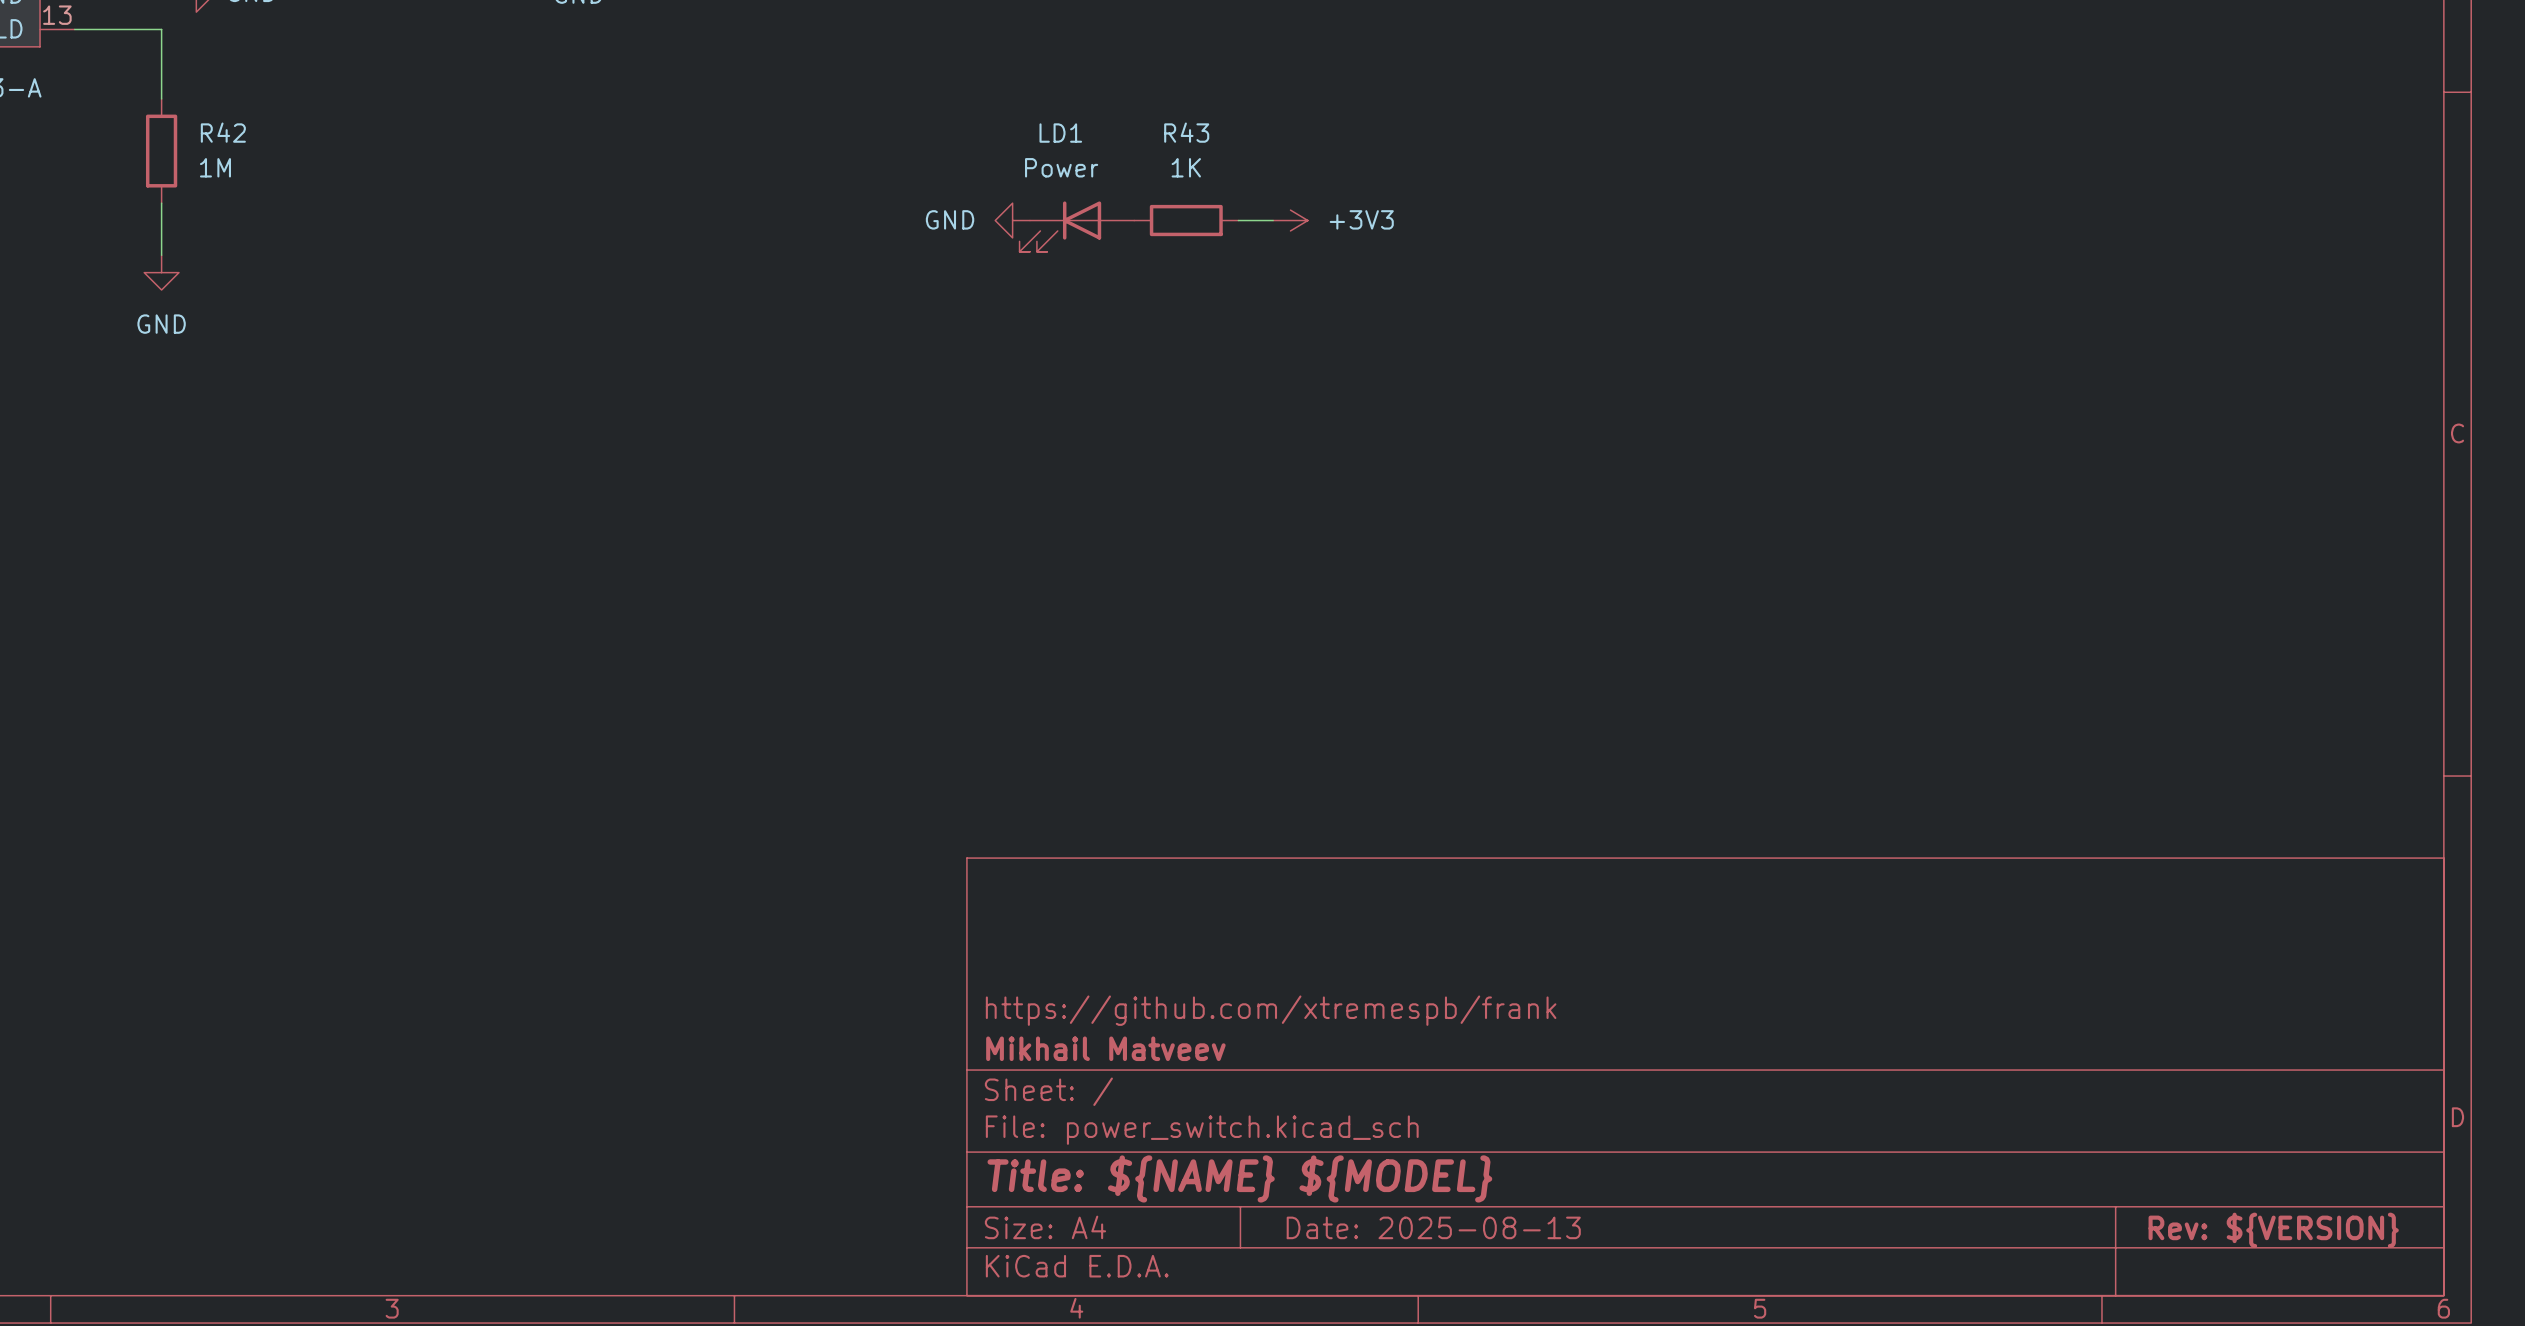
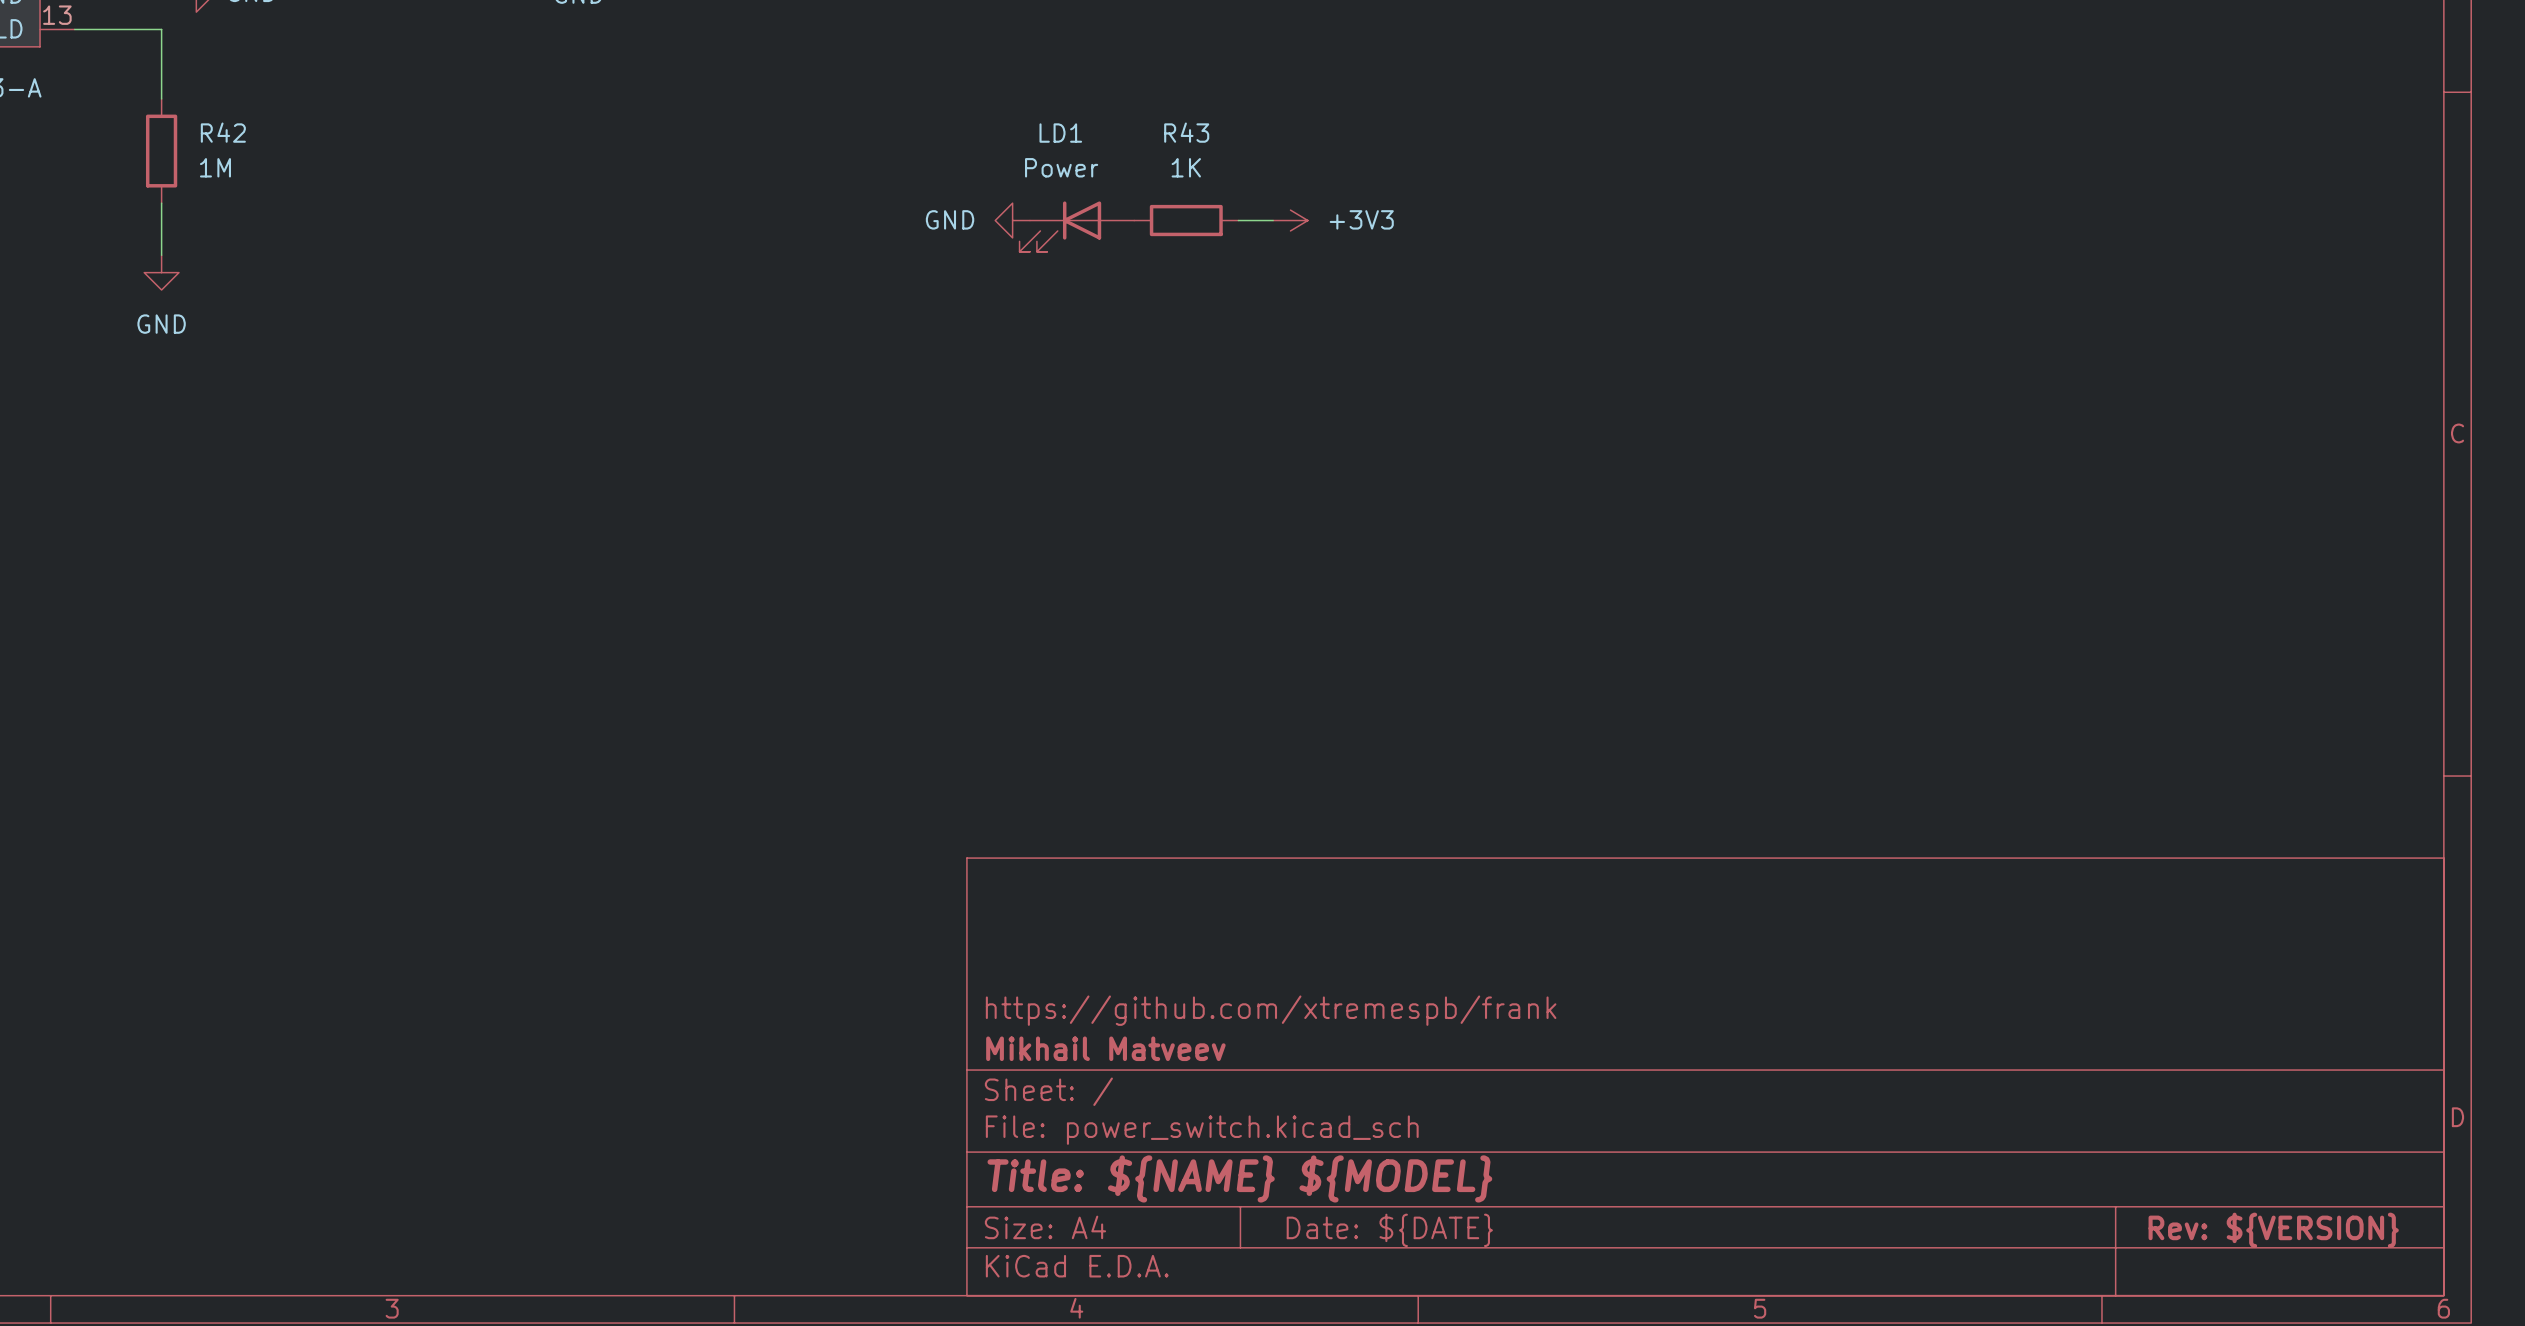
title block: Date: 2025-08-13 (1433, 1227) -> Date: ${DATE} (1389, 1230)

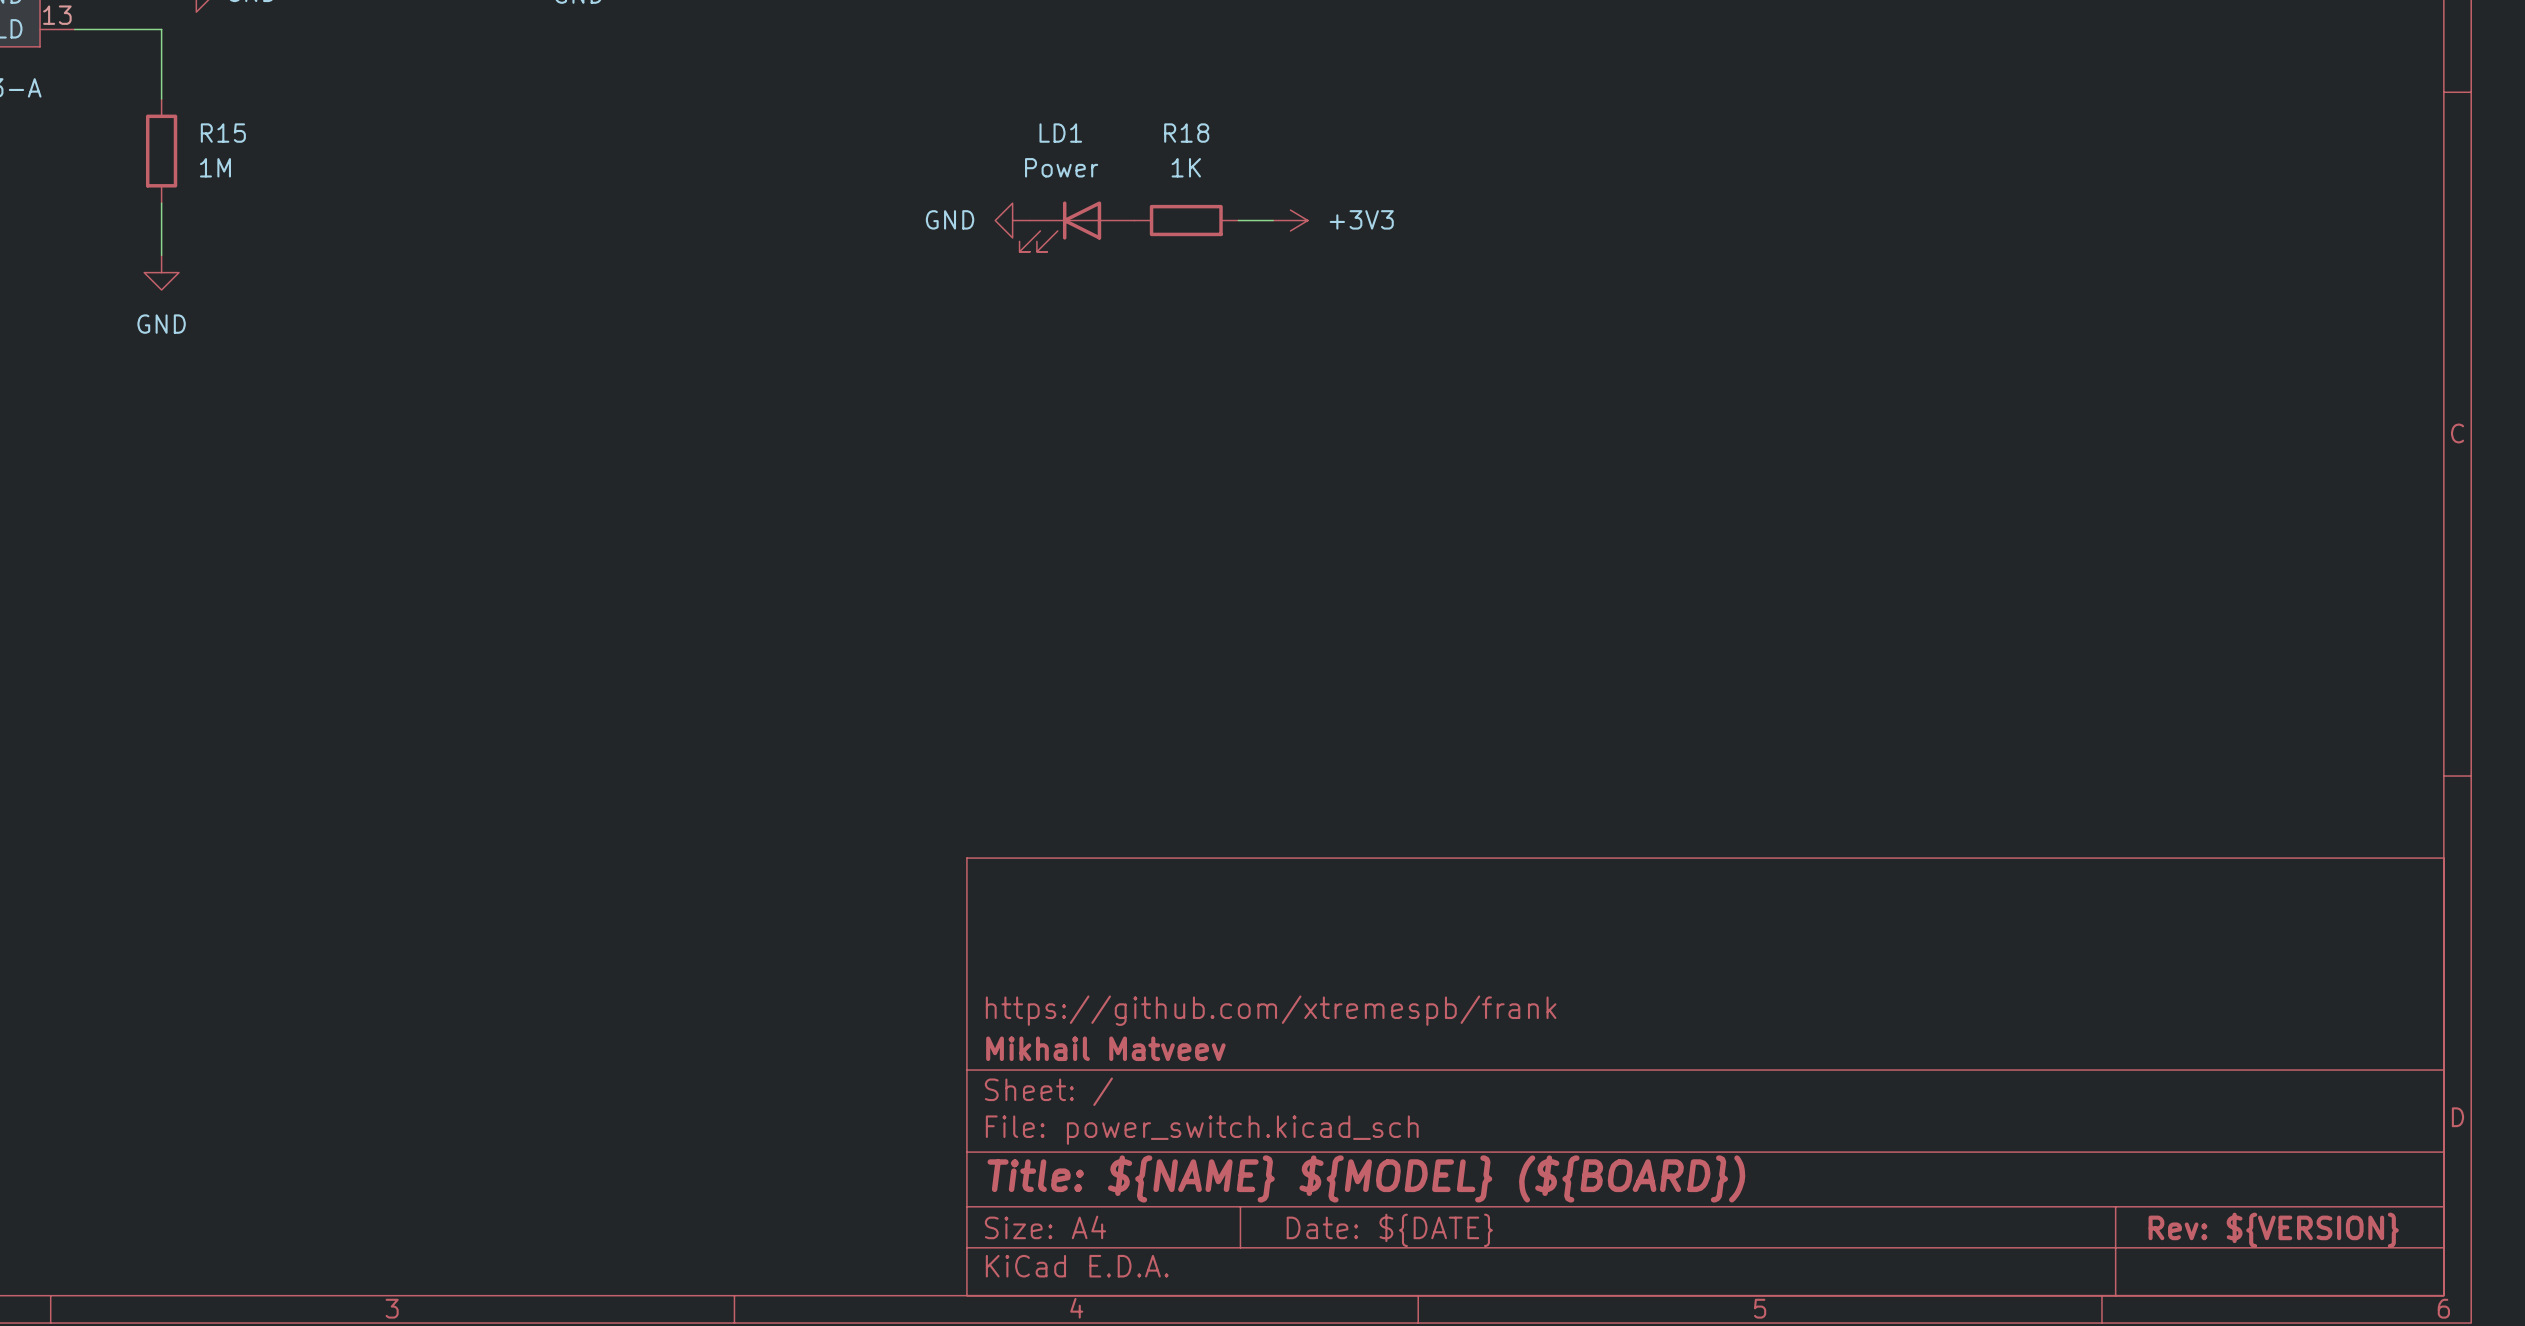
R42 name: R42 (223, 132) -> R15 (223, 133)
R43 name: R43 (1186, 132) -> R18 (1186, 133)
title block: Title: ${NAME} ${MODEL} (1239, 1178) -> Title: ${NAME} ${MODEL} (${BOARD}) (1366, 1178)

